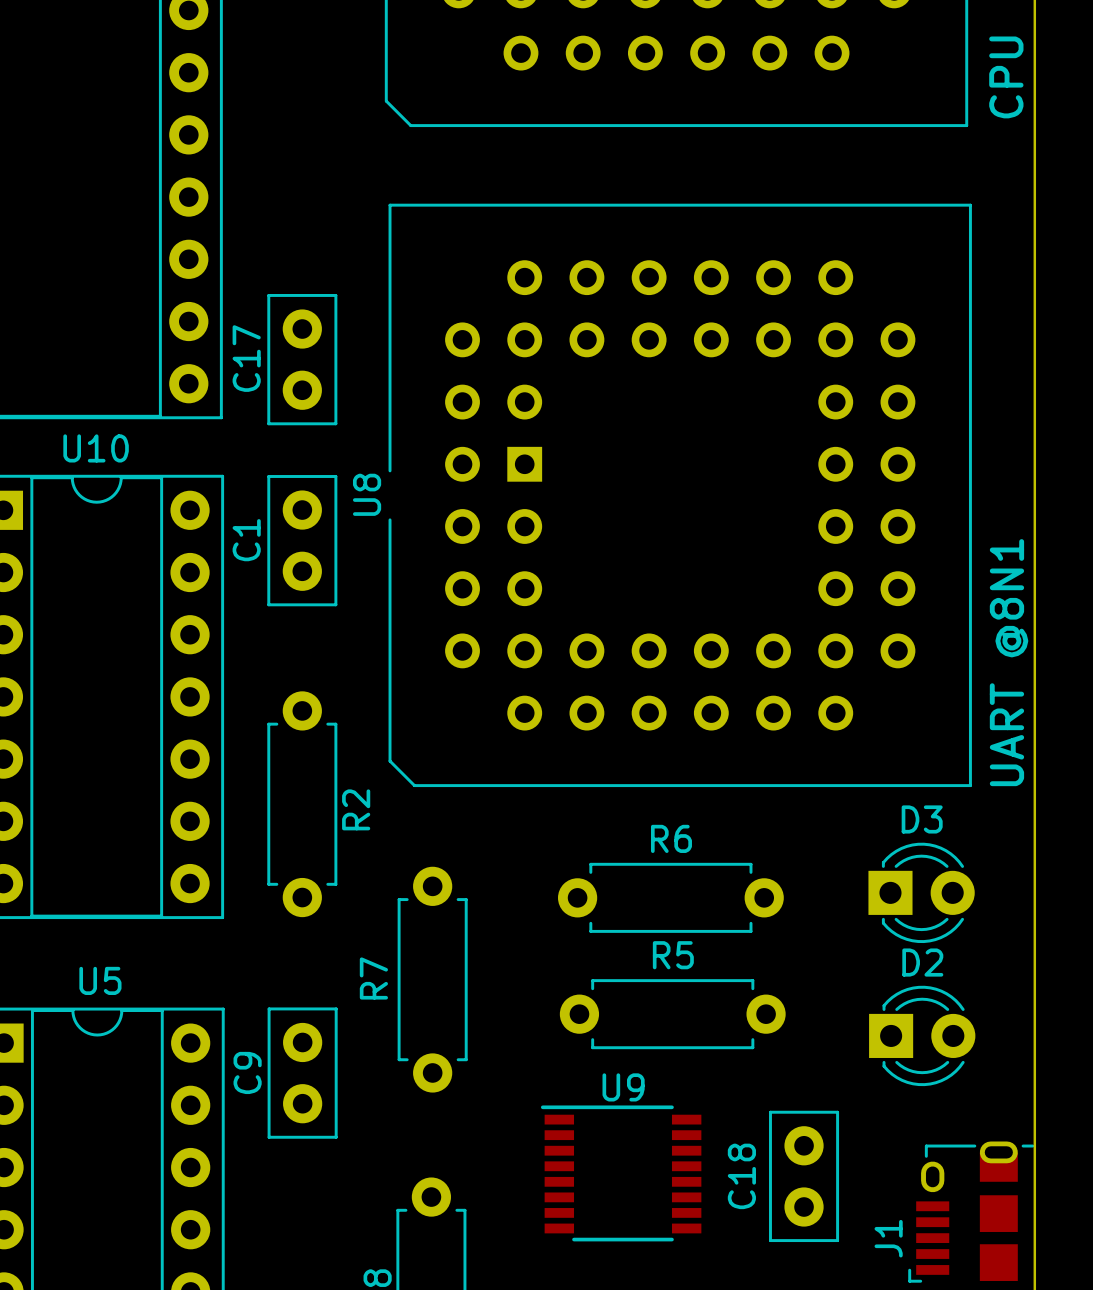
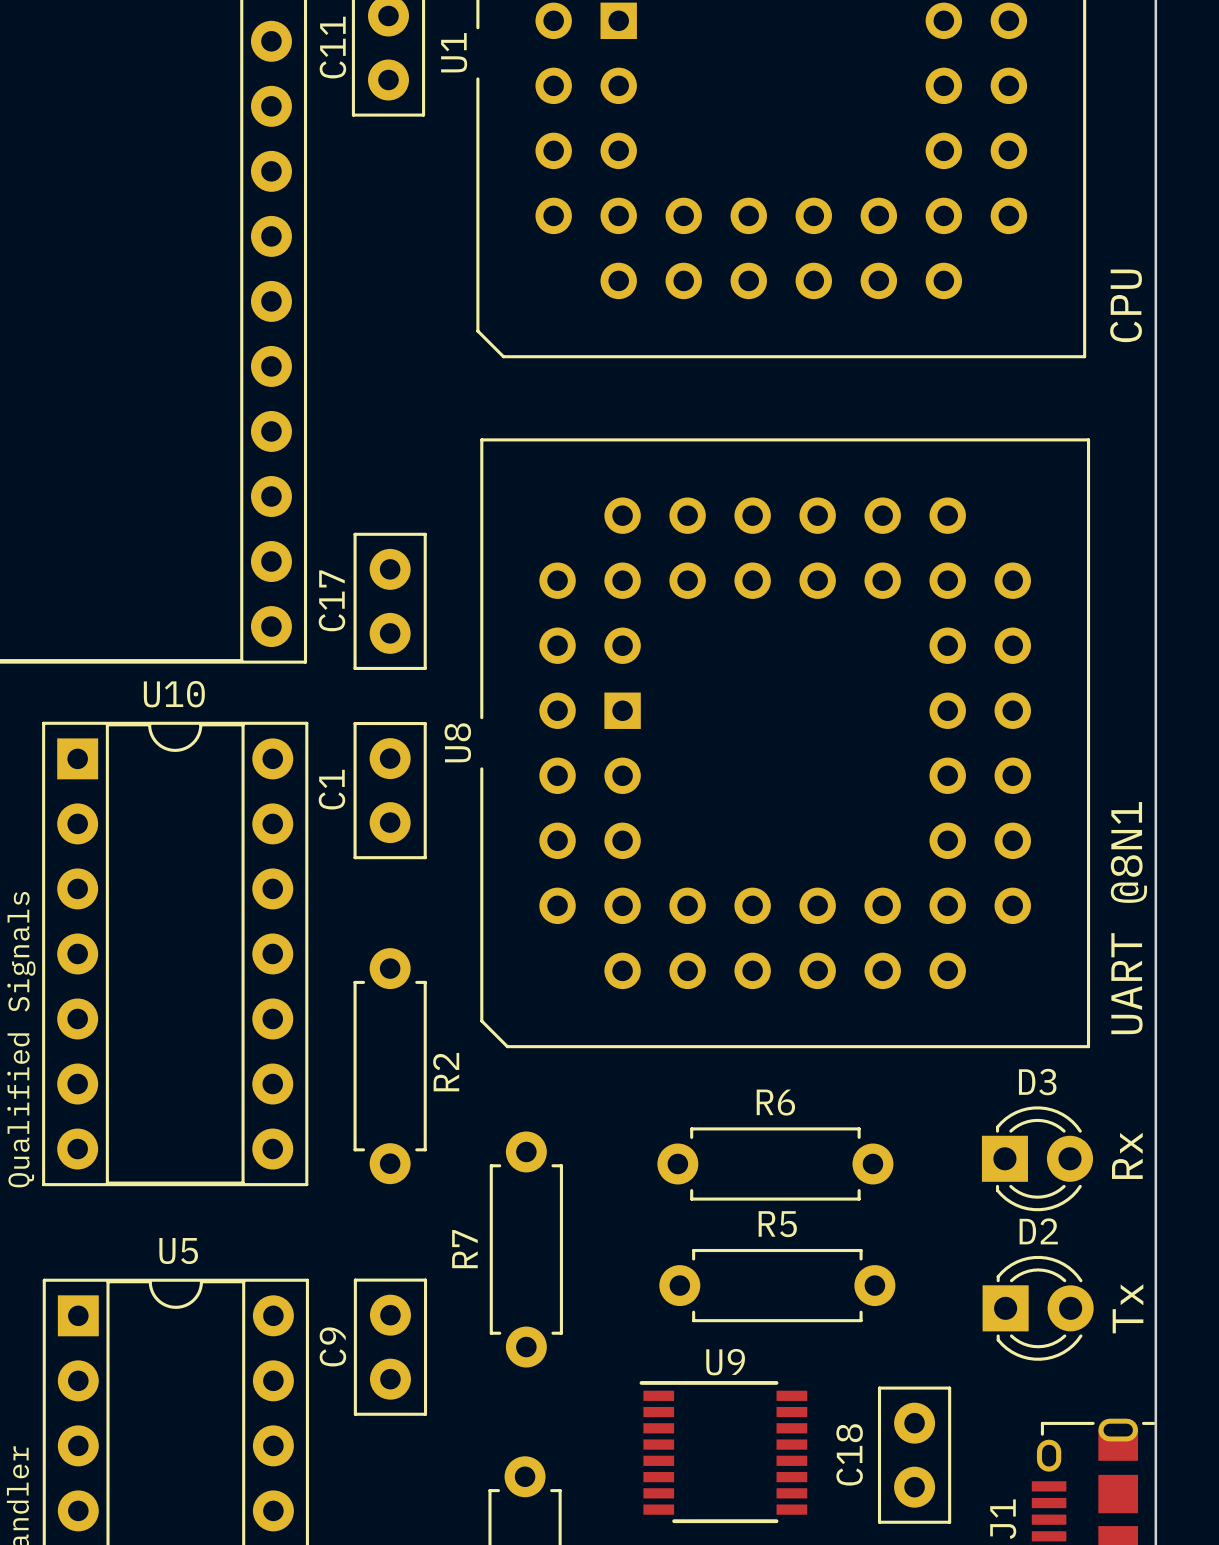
text: none -> Rx (1127, 1155)
text: none -> Tx (1128, 1308)

